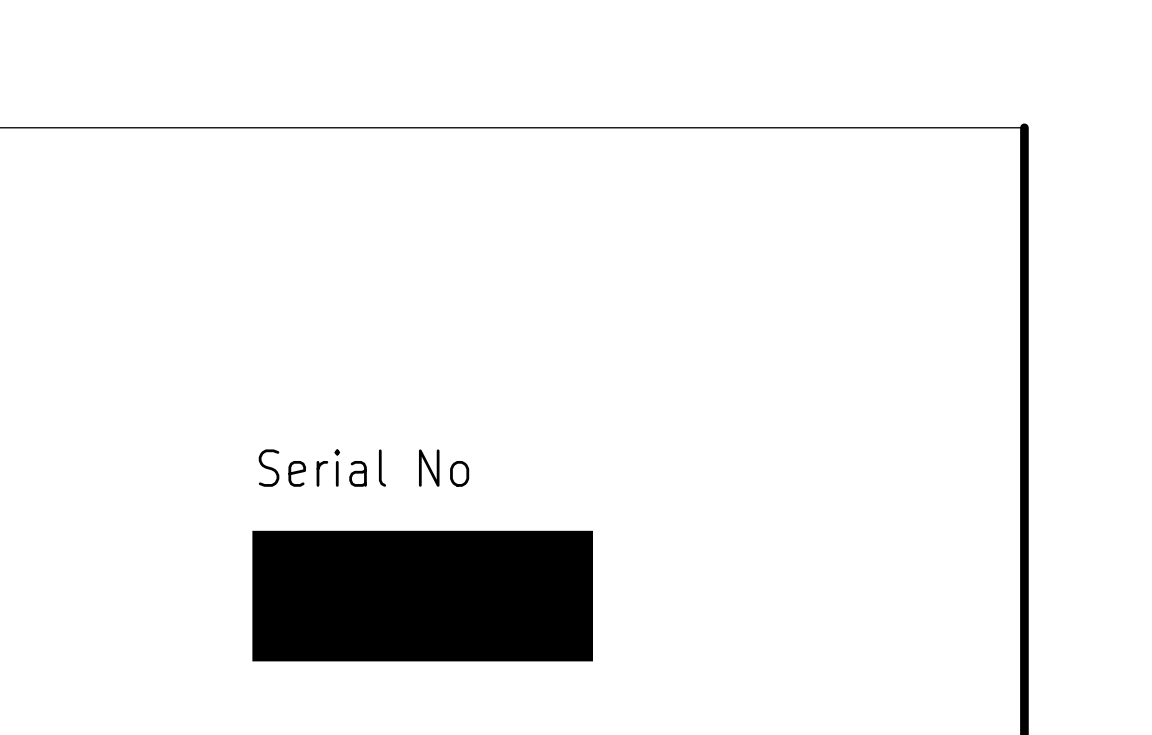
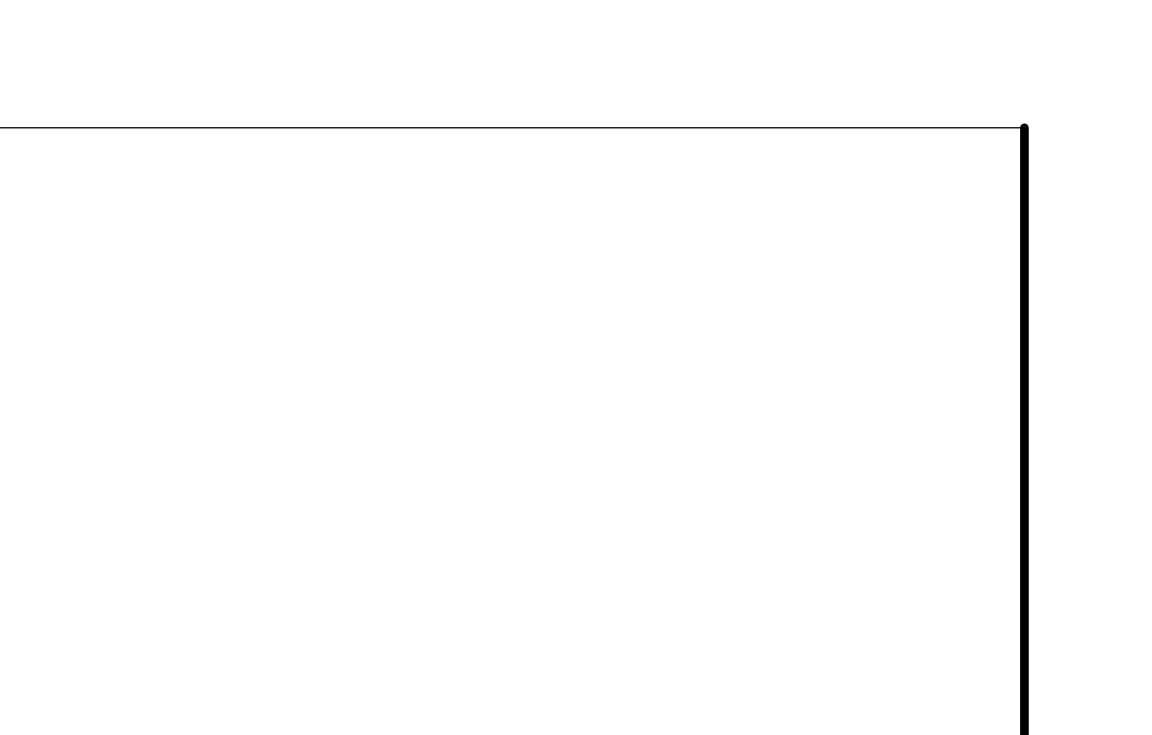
text: Serial No (363, 468) -> none
drawing: [252, 530, 594, 662] -> none

